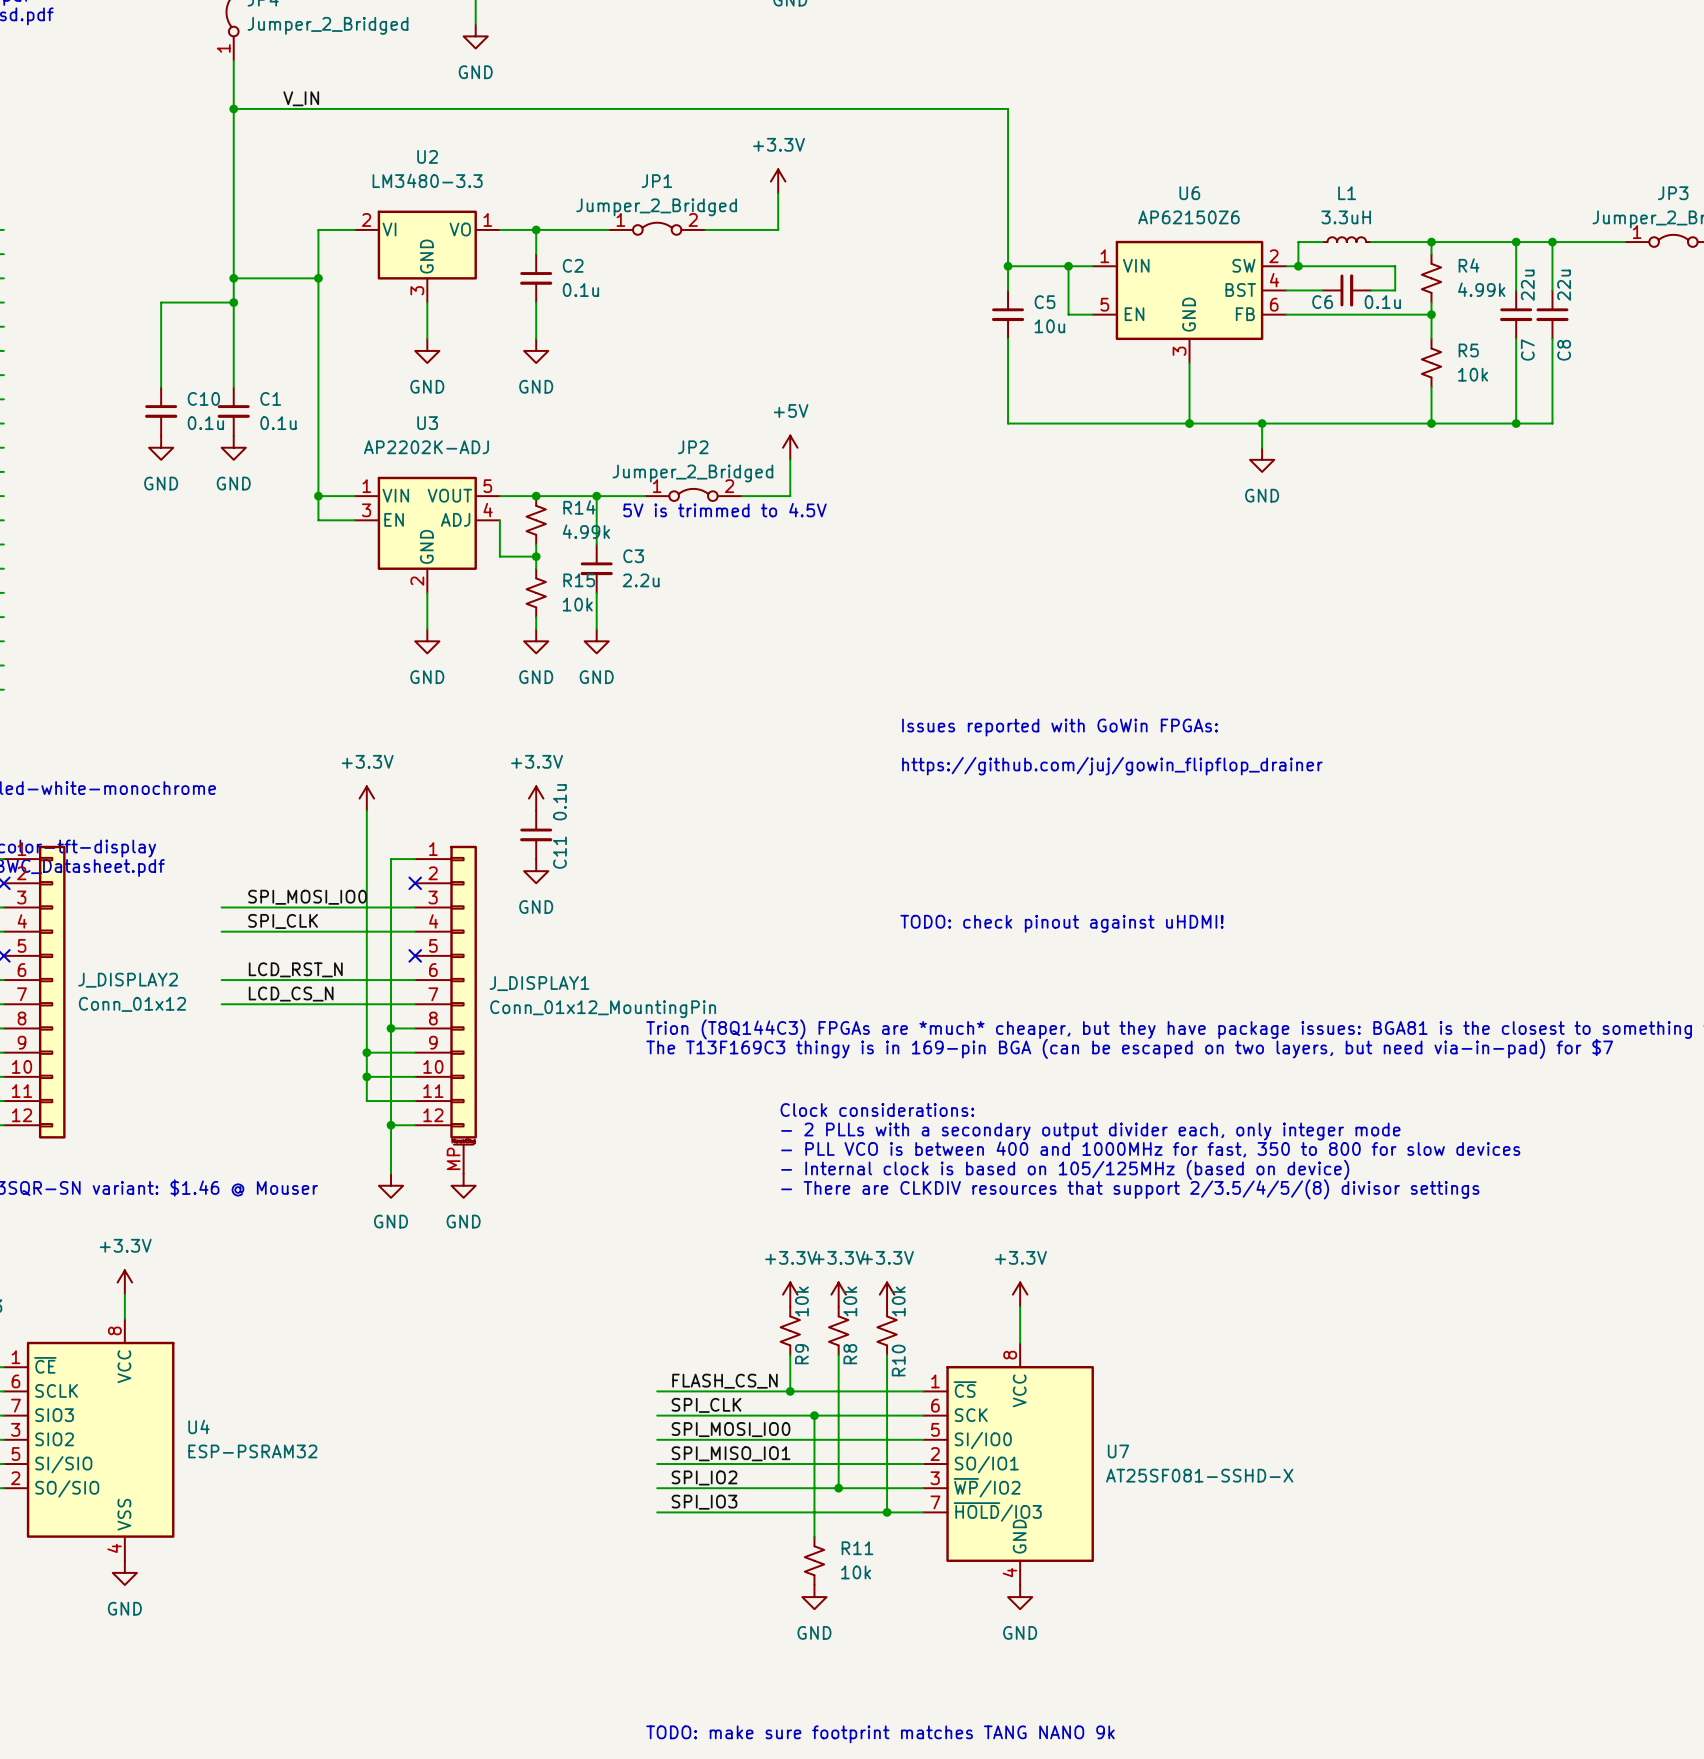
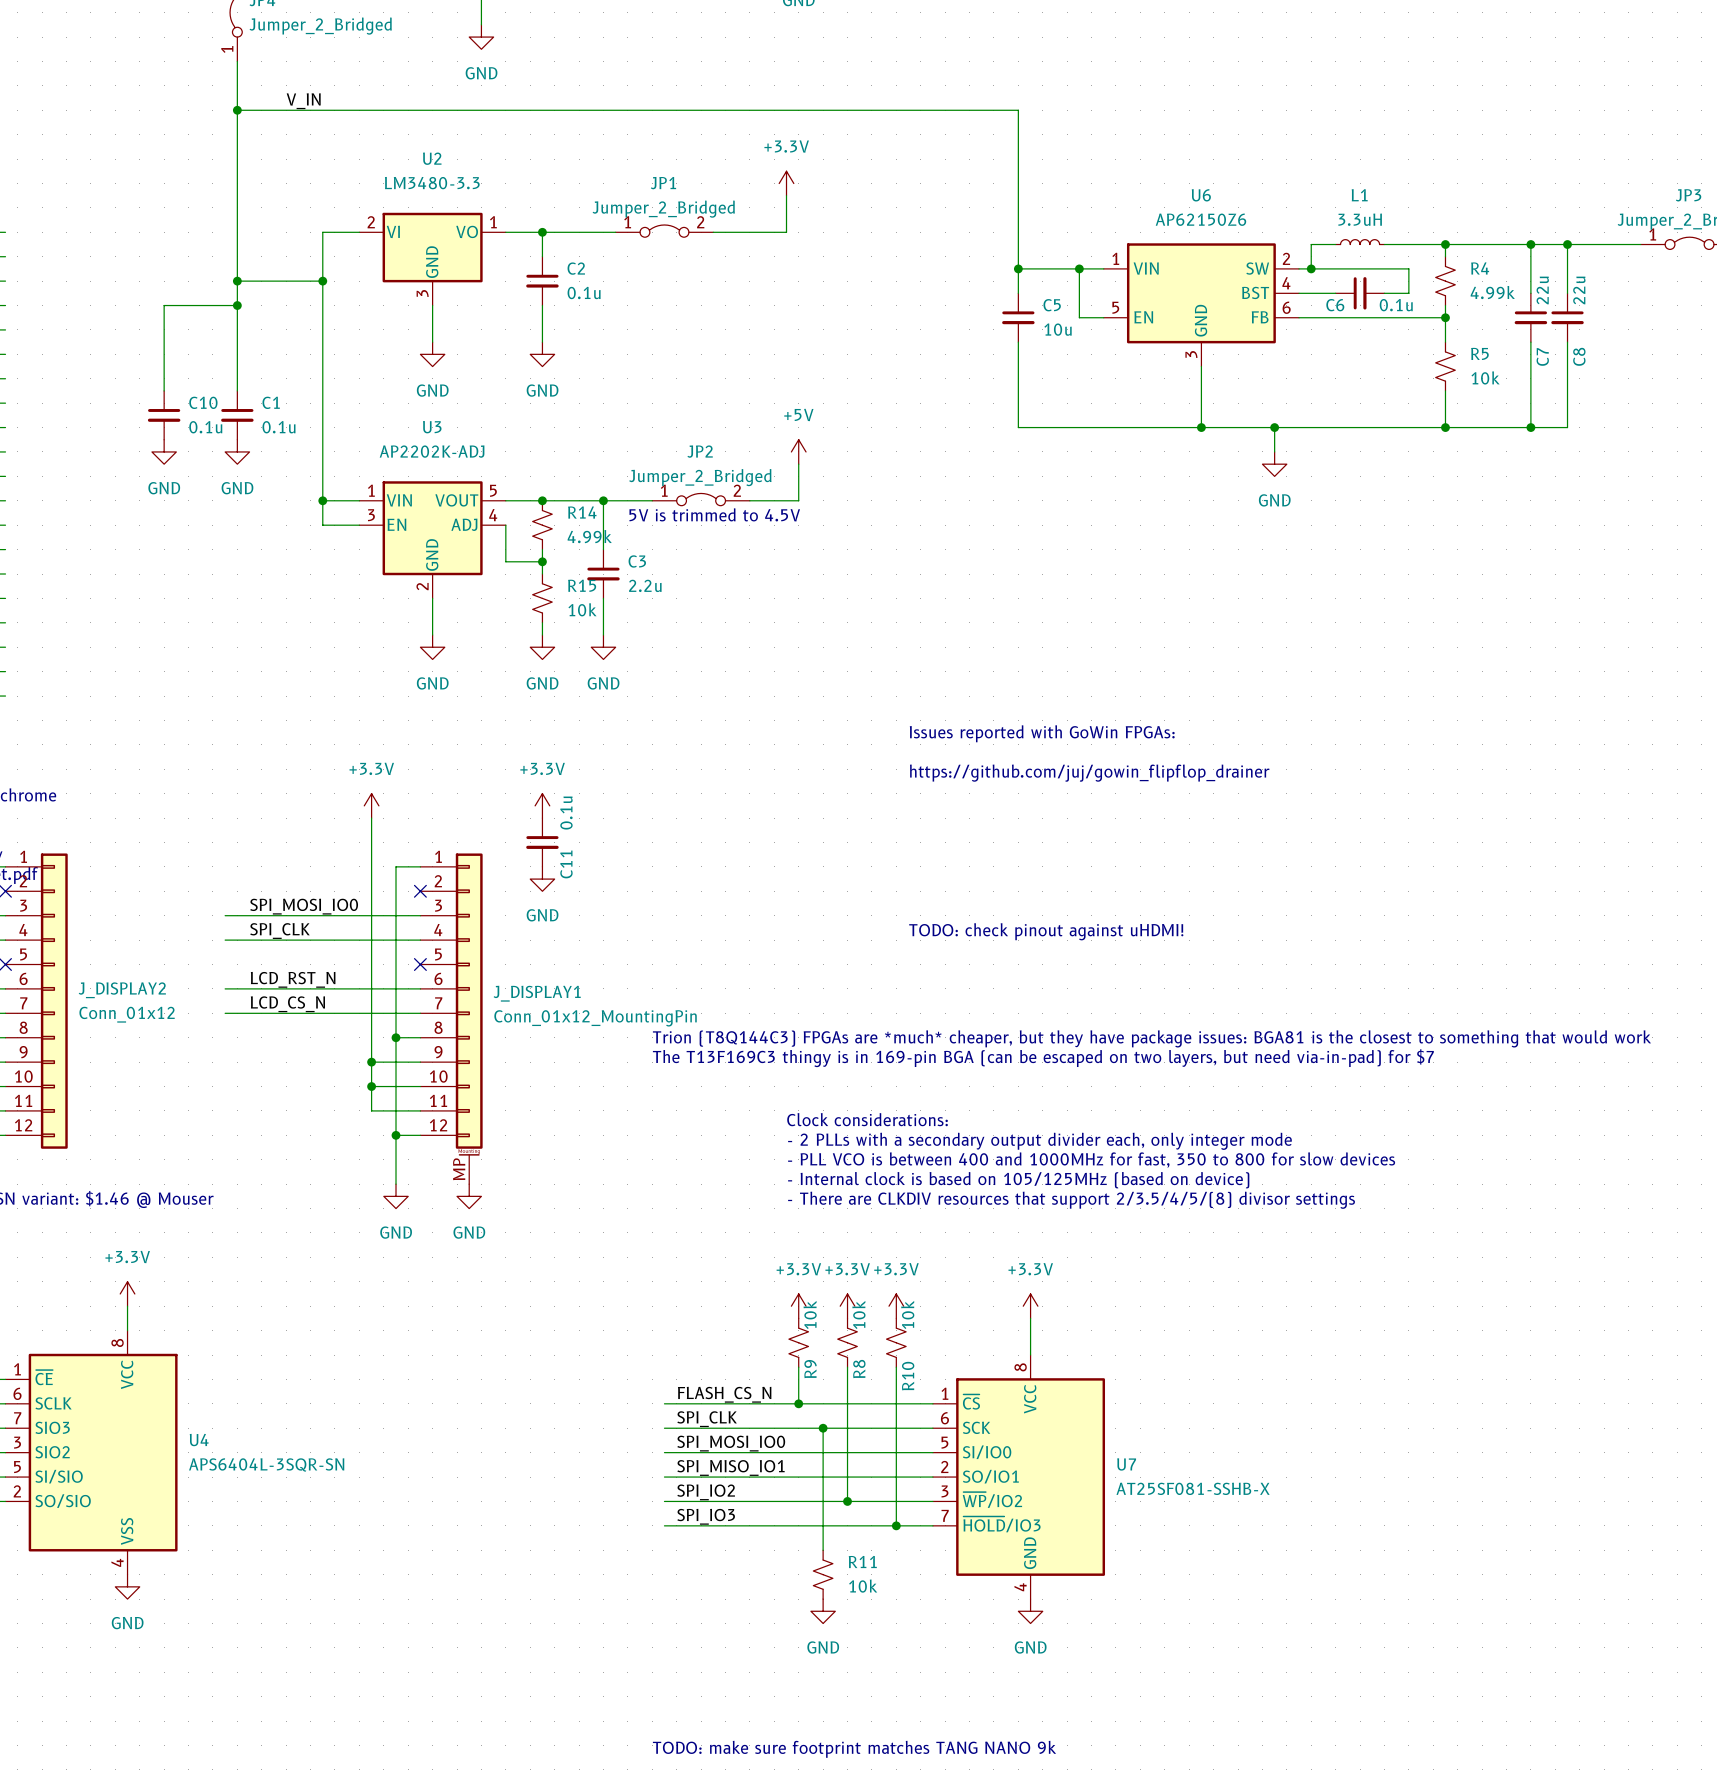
U4 value: ESP-PSRAM32 (252, 1451) -> APS6404L-3SQR-SN (266, 1464)
U7 value: AT25SF081-SSHD-X (1199, 1475) -> AT25SF081-SSHB-X (1193, 1488)

